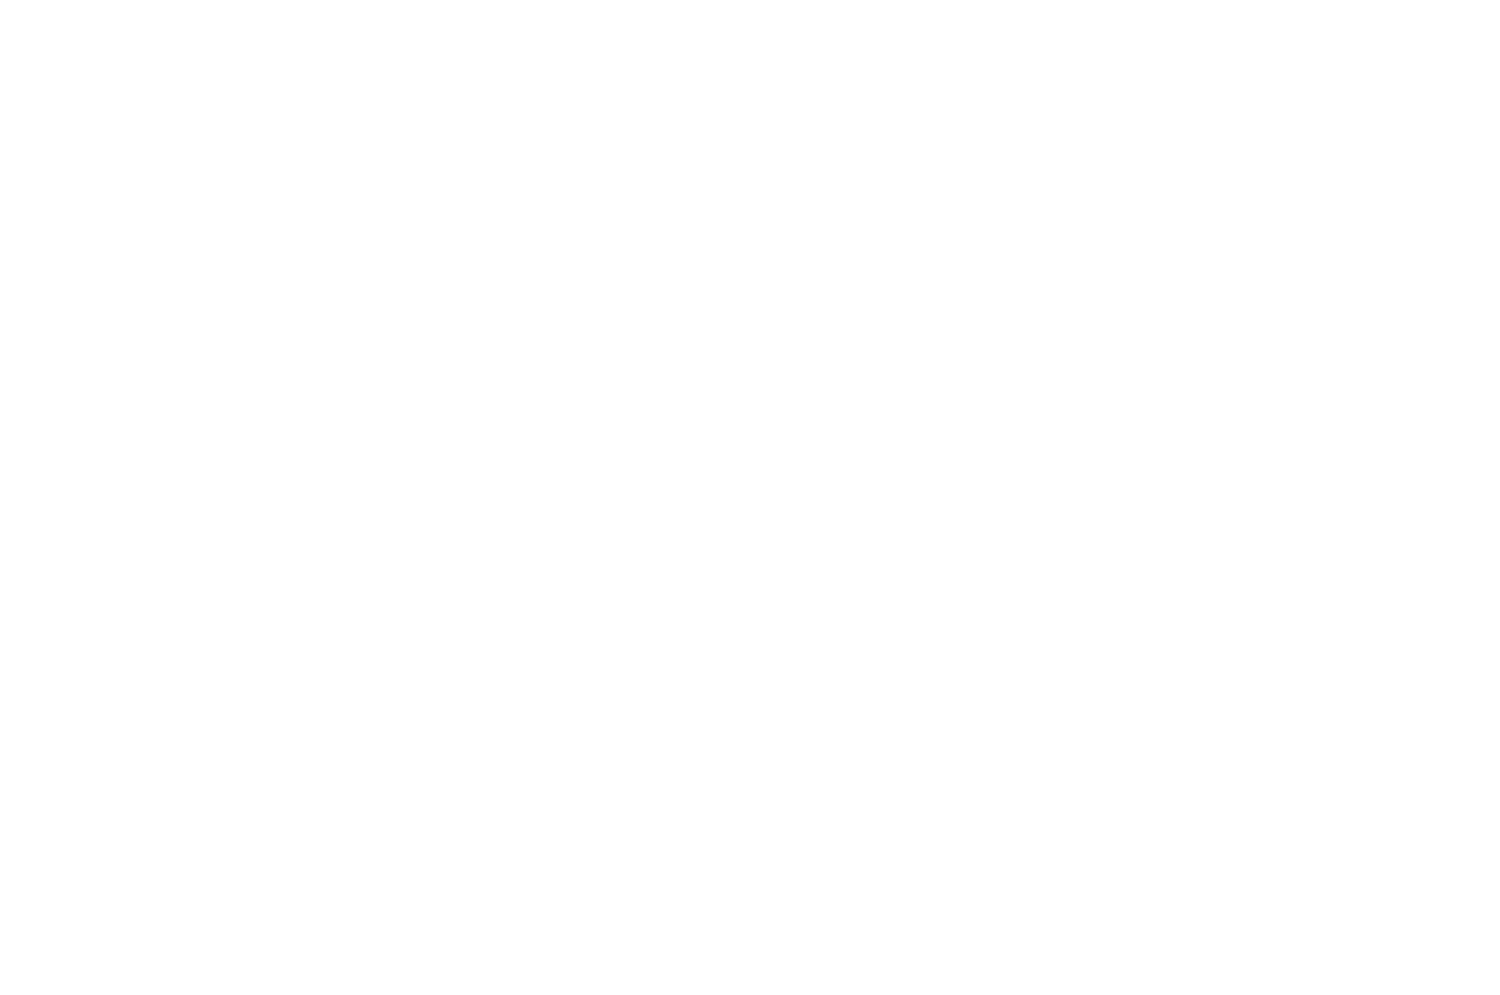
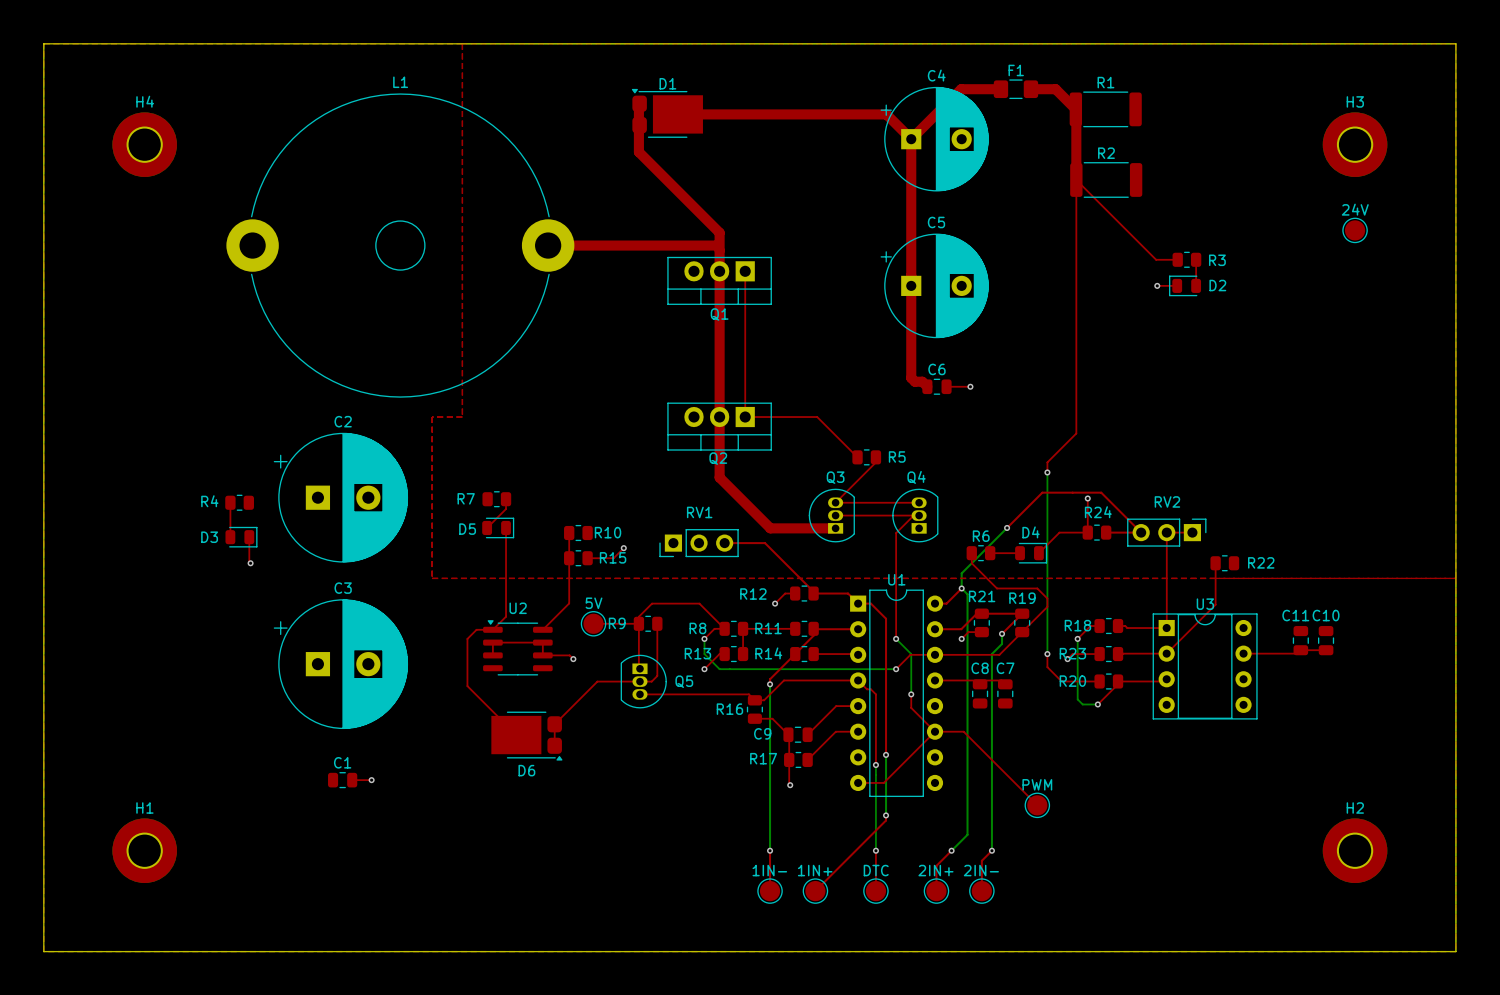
board edge: none -> (43, 43) (1455, 43) (1455, 951) (43, 951) (43, 43)
top zone outline: none -> (462, 43) (462, 417) (432, 417) (432, 578) (1455, 578)
top track: none -> (1000, 89) (961, 89) (911, 139)
F1: none -> (1015, 89)
top track: none -> (1030, 89) (1055, 89) (1076, 109) (1076, 179)
top track: none -> (638, 103) (638, 152) (719, 232) (719, 477) (770, 528) (835, 528)
R1: none -> (1105, 109)
D1: none -> (667, 113)
top track: none -> (677, 114) (886, 114) (911, 139)
top track: none -> (911, 139) (911, 378) (914, 381) (922, 381) (927, 386)
C4: none -> (934, 139)
H4: none -> (144, 144)
H3: none -> (1355, 144)
top track: none -> (1076, 179) (1156, 259) (1177, 259)
top track: none -> (1076, 179) (1076, 433) (1047, 462) (1047, 472)
R2: none -> (1106, 179)
24V: none -> (1355, 230)
L1: none -> (400, 245)
top track: none -> (548, 245) (714, 245) (719, 250)
R3: none -> (1186, 259)
top track: none -> (1196, 259) (1196, 285)
top track: none -> (745, 271) (745, 417) (817, 417) (857, 457)
Q1: none -> (719, 280)
C5: none -> (934, 285)
top track: none -> (1157, 285) (1177, 285)
via: none -> (1157, 285)
D2: none -> (1185, 285)
C6: none -> (936, 386)
top track: none -> (946, 386) (970, 386)
via: none -> (970, 386)
Q2: none -> (719, 426)
R5: none -> (866, 457)
top track: none -> (875, 457) (875, 462) (835, 502) (919, 502)
bottom track: none -> (1047, 472) (1047, 654)
via: none -> (1047, 472)
C2: none -> (340, 497)
top track: none -> (1087, 498) (1087, 532) (1059, 532) (1038, 553)
via: none -> (1087, 498)
R7: none -> (496, 499)
top track: none -> (506, 499) (506, 509) (487, 527)
top track: none -> (230, 502) (230, 537)
R4: none -> (239, 502)
Q3: none -> (831, 515)
top track: none -> (835, 515) (919, 515)
top track: none -> (913, 515) (896, 533) (896, 638)
Q4: none -> (915, 515)
D5: none -> (498, 527)
top track: none -> (506, 527) (506, 616) (492, 629) (476, 629) (467, 638) (467, 686) (516, 735)
top track: none -> (1007, 527) (1042, 492) (1101, 492) (1141, 532) (1106, 532)
bottom track: none -> (1007, 527) (961, 573) (961, 588) (967, 594) (967, 834) (951, 850)
via: none -> (1007, 527)
R24: none -> (1096, 532)
RV2: none -> (1166, 532)
top track: none -> (1192, 532) (1166, 532) (1166, 627)
top track: none -> (569, 533) (569, 603) (542, 629)
R10: none -> (578, 533)
D3: none -> (241, 537)
top track: none -> (249, 537) (250, 563)
RV1: none -> (699, 543)
top track: none -> (724, 543) (765, 543) (813, 593) (848, 593) (858, 603) (870, 603) (886, 618) (886, 754)
top track: none -> (623, 548) (613, 558) (587, 558)
via: none -> (623, 548)
top track: none -> (971, 553) (971, 563) (996, 588) (1037, 588) (1047, 598) (1047, 606) (999, 654) (910, 654) (896, 669)
R6: none -> (980, 553)
top track: none -> (990, 553) (1020, 553)
D4: none -> (1031, 553)
R15: none -> (578, 558)
via: none -> (250, 563)
top track: none -> (1215, 563) (1215, 604) (1166, 653) (1123, 654)
R22: none -> (1224, 563)
top track: none -> (961, 588) (946, 603) (935, 603)
via: none -> (961, 588)
top track: none -> (795, 593) (785, 593) (775, 603)
R12: none -> (804, 593)
via: none -> (775, 603)
R21: none -> (981, 622)
R19: none -> (1022, 622)
top track: none -> (593, 623) (638, 623)
5V: none -> (593, 623)
R9: none -> (648, 623)
top track: none -> (657, 623) (657, 675) (651, 681) (597, 681) (554, 724) (554, 745)
top track: none -> (1118, 623) (1118, 626) (1125, 626) (1127, 628) (1166, 628)
top track: none -> (1099, 626) (1090, 626) (1077, 638)
R18: none -> (1108, 626)
R8: none -> (733, 628)
top track: none -> (795, 628) (743, 628) (743, 654)
R11: none -> (804, 628)
top track: none -> (858, 629) (813, 628) (813, 635) (770, 679) (770, 684)
top track: none -> (935, 629) (961, 629) (976, 613) (1022, 613) (1002, 633)
top track: none -> (981, 632) (968, 632) (961, 638)
bottom track: none -> (1002, 633) (1002, 643) (991, 654) (991, 850)
via: none -> (1002, 633)
top track: none -> (704, 638) (714, 628) (724, 628) (699, 603) (652, 603) (638, 616) (639, 668)
bottom track: none -> (704, 638) (704, 654) (719, 669) (896, 669)
via: none -> (704, 638)
bottom track: none -> (896, 638) (911, 654) (911, 694)
via: none -> (896, 638)
via: none -> (961, 638)
bottom track: none -> (1077, 638) (1077, 699) (1082, 704) (1097, 704)
via: none -> (1077, 638)
C11: none -> (1300, 640)
C10: none -> (1326, 640)
U2: none -> (517, 647)
top track: none -> (1326, 650) (1300, 650) (1297, 653) (1243, 653)
top track: none -> (724, 654) (719, 654) (704, 669)
R13: none -> (733, 654)
R14: none -> (804, 654)
top track: none -> (813, 654) (858, 654)
top track: none -> (1047, 654) (1047, 667) (1061, 681) (1099, 681)
via: none -> (1047, 654)
top track: none -> (1099, 654) (1072, 654) (1067, 659)
R23: none -> (1108, 654)
top track: none -> (492, 655) (492, 642) (542, 642) (542, 655) (569, 655) (573, 659)
via: none -> (573, 659)
via: none -> (1067, 659)
C3: none -> (340, 664)
U3: none -> (1205, 666)
via: none -> (704, 669)
via: none -> (896, 669)
top track: none -> (1166, 679) (1164, 681) (1118, 681) (1118, 684) (1097, 704)
top track: none -> (935, 680) (1001, 680) (1005, 684)
Q5: none -> (643, 681)
R20: none -> (1108, 681)
bottom track: none -> (770, 684) (770, 850)
via: none -> (770, 684)
U1: none -> (896, 693)
C8: none -> (980, 693)
C7: none -> (1005, 693)
top track: none -> (639, 694) (748, 694) (754, 700) (764, 700) (783, 680) (858, 680) (867, 689) (870, 689) (875, 694) (875, 765)
top track: none -> (911, 694) (911, 707) (935, 731)
via: none -> (911, 694)
via: none -> (1097, 704)
top track: none -> (858, 706) (836, 706) (807, 734)
R16: none -> (754, 709)
top track: none -> (754, 718) (772, 718) (789, 735) (790, 785)
top track: none -> (858, 731) (835, 731) (807, 759)
top track: none -> (935, 731) (963, 731) (1037, 805)
top track: none -> (935, 731) (883, 782) (858, 782)
C9: none -> (798, 734)
D6: none -> (526, 736)
bottom track: none -> (886, 754) (886, 815)
via: none -> (886, 754)
R17: none -> (798, 759)
bottom track: none -> (875, 765) (875, 850)
via: none -> (875, 765)
C1: none -> (342, 780)
top track: none -> (352, 780) (371, 780)
via: none -> (371, 780)
via: none -> (790, 785)
PWM: none -> (1037, 805)
top track: none -> (886, 815) (886, 820) (815, 891)
via: none -> (886, 815)
H1: none -> (144, 850)
top track: none -> (770, 850) (770, 891)
via: none -> (770, 850)
top track: none -> (875, 850) (875, 891)
via: none -> (875, 850)
top track: none -> (951, 850) (936, 865) (936, 891)
via: none -> (951, 850)
top track: none -> (991, 850) (981, 860) (981, 891)
via: none -> (991, 850)
H2: none -> (1355, 850)
1IN-: none -> (770, 891)
1IN+: none -> (815, 891)
DTC: none -> (875, 891)
2IN+: none -> (936, 891)
2IN-: none -> (981, 891)

